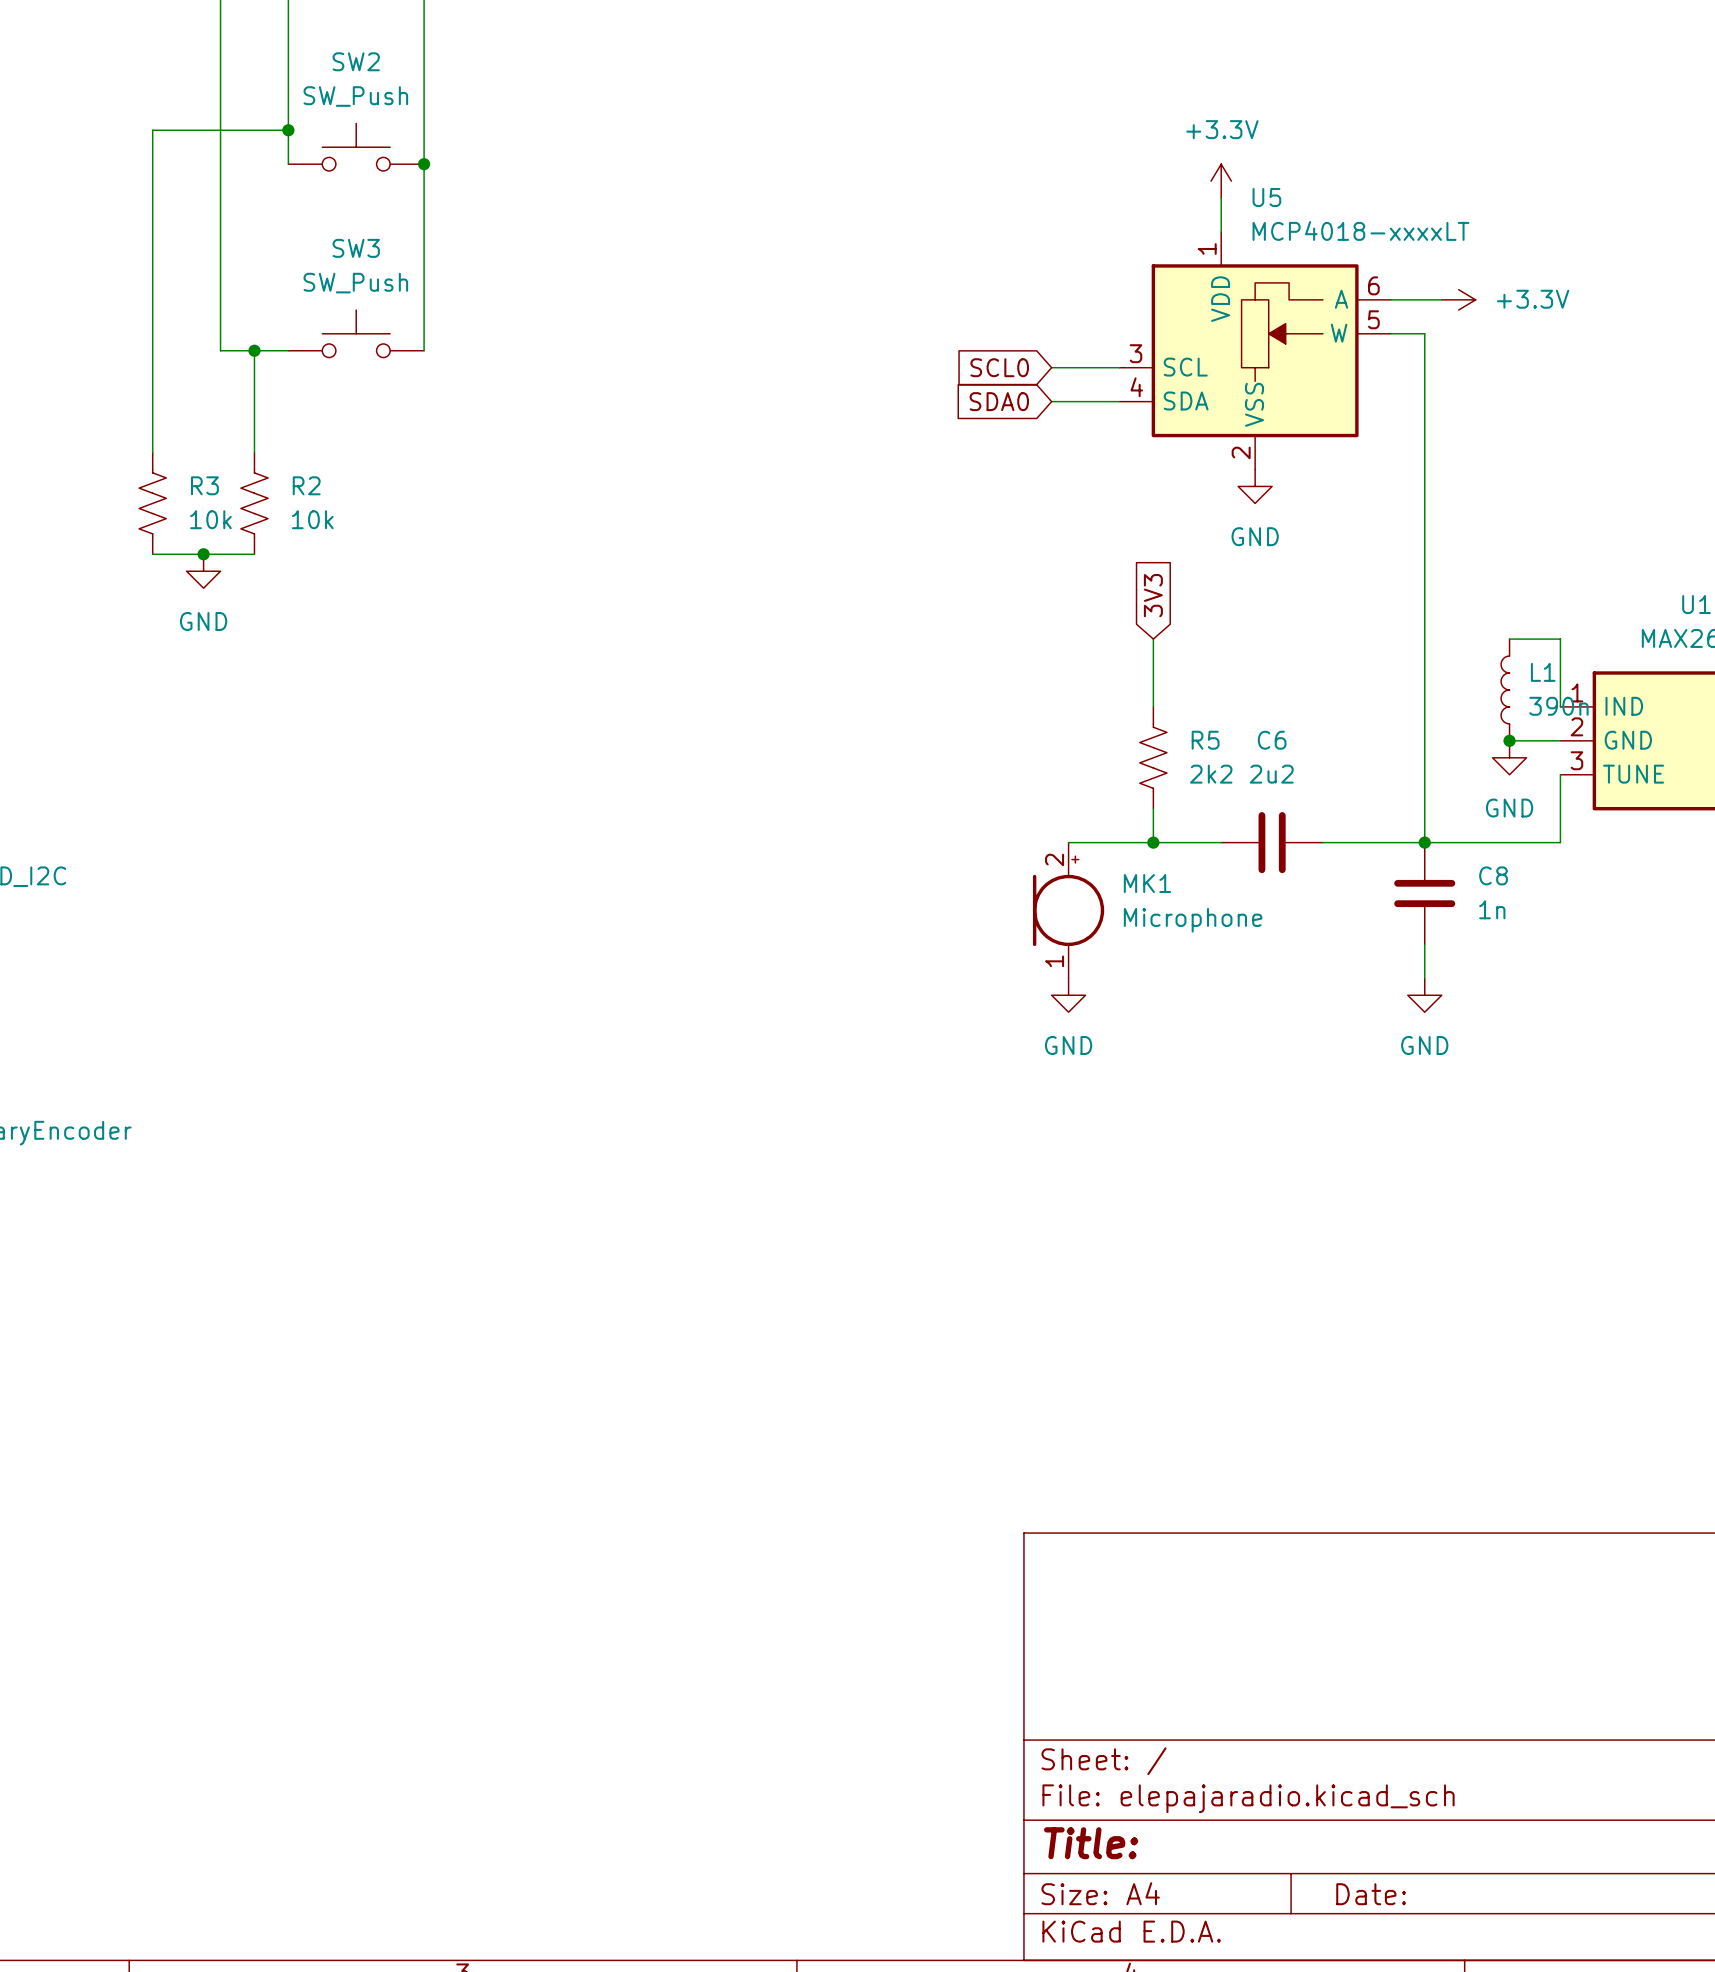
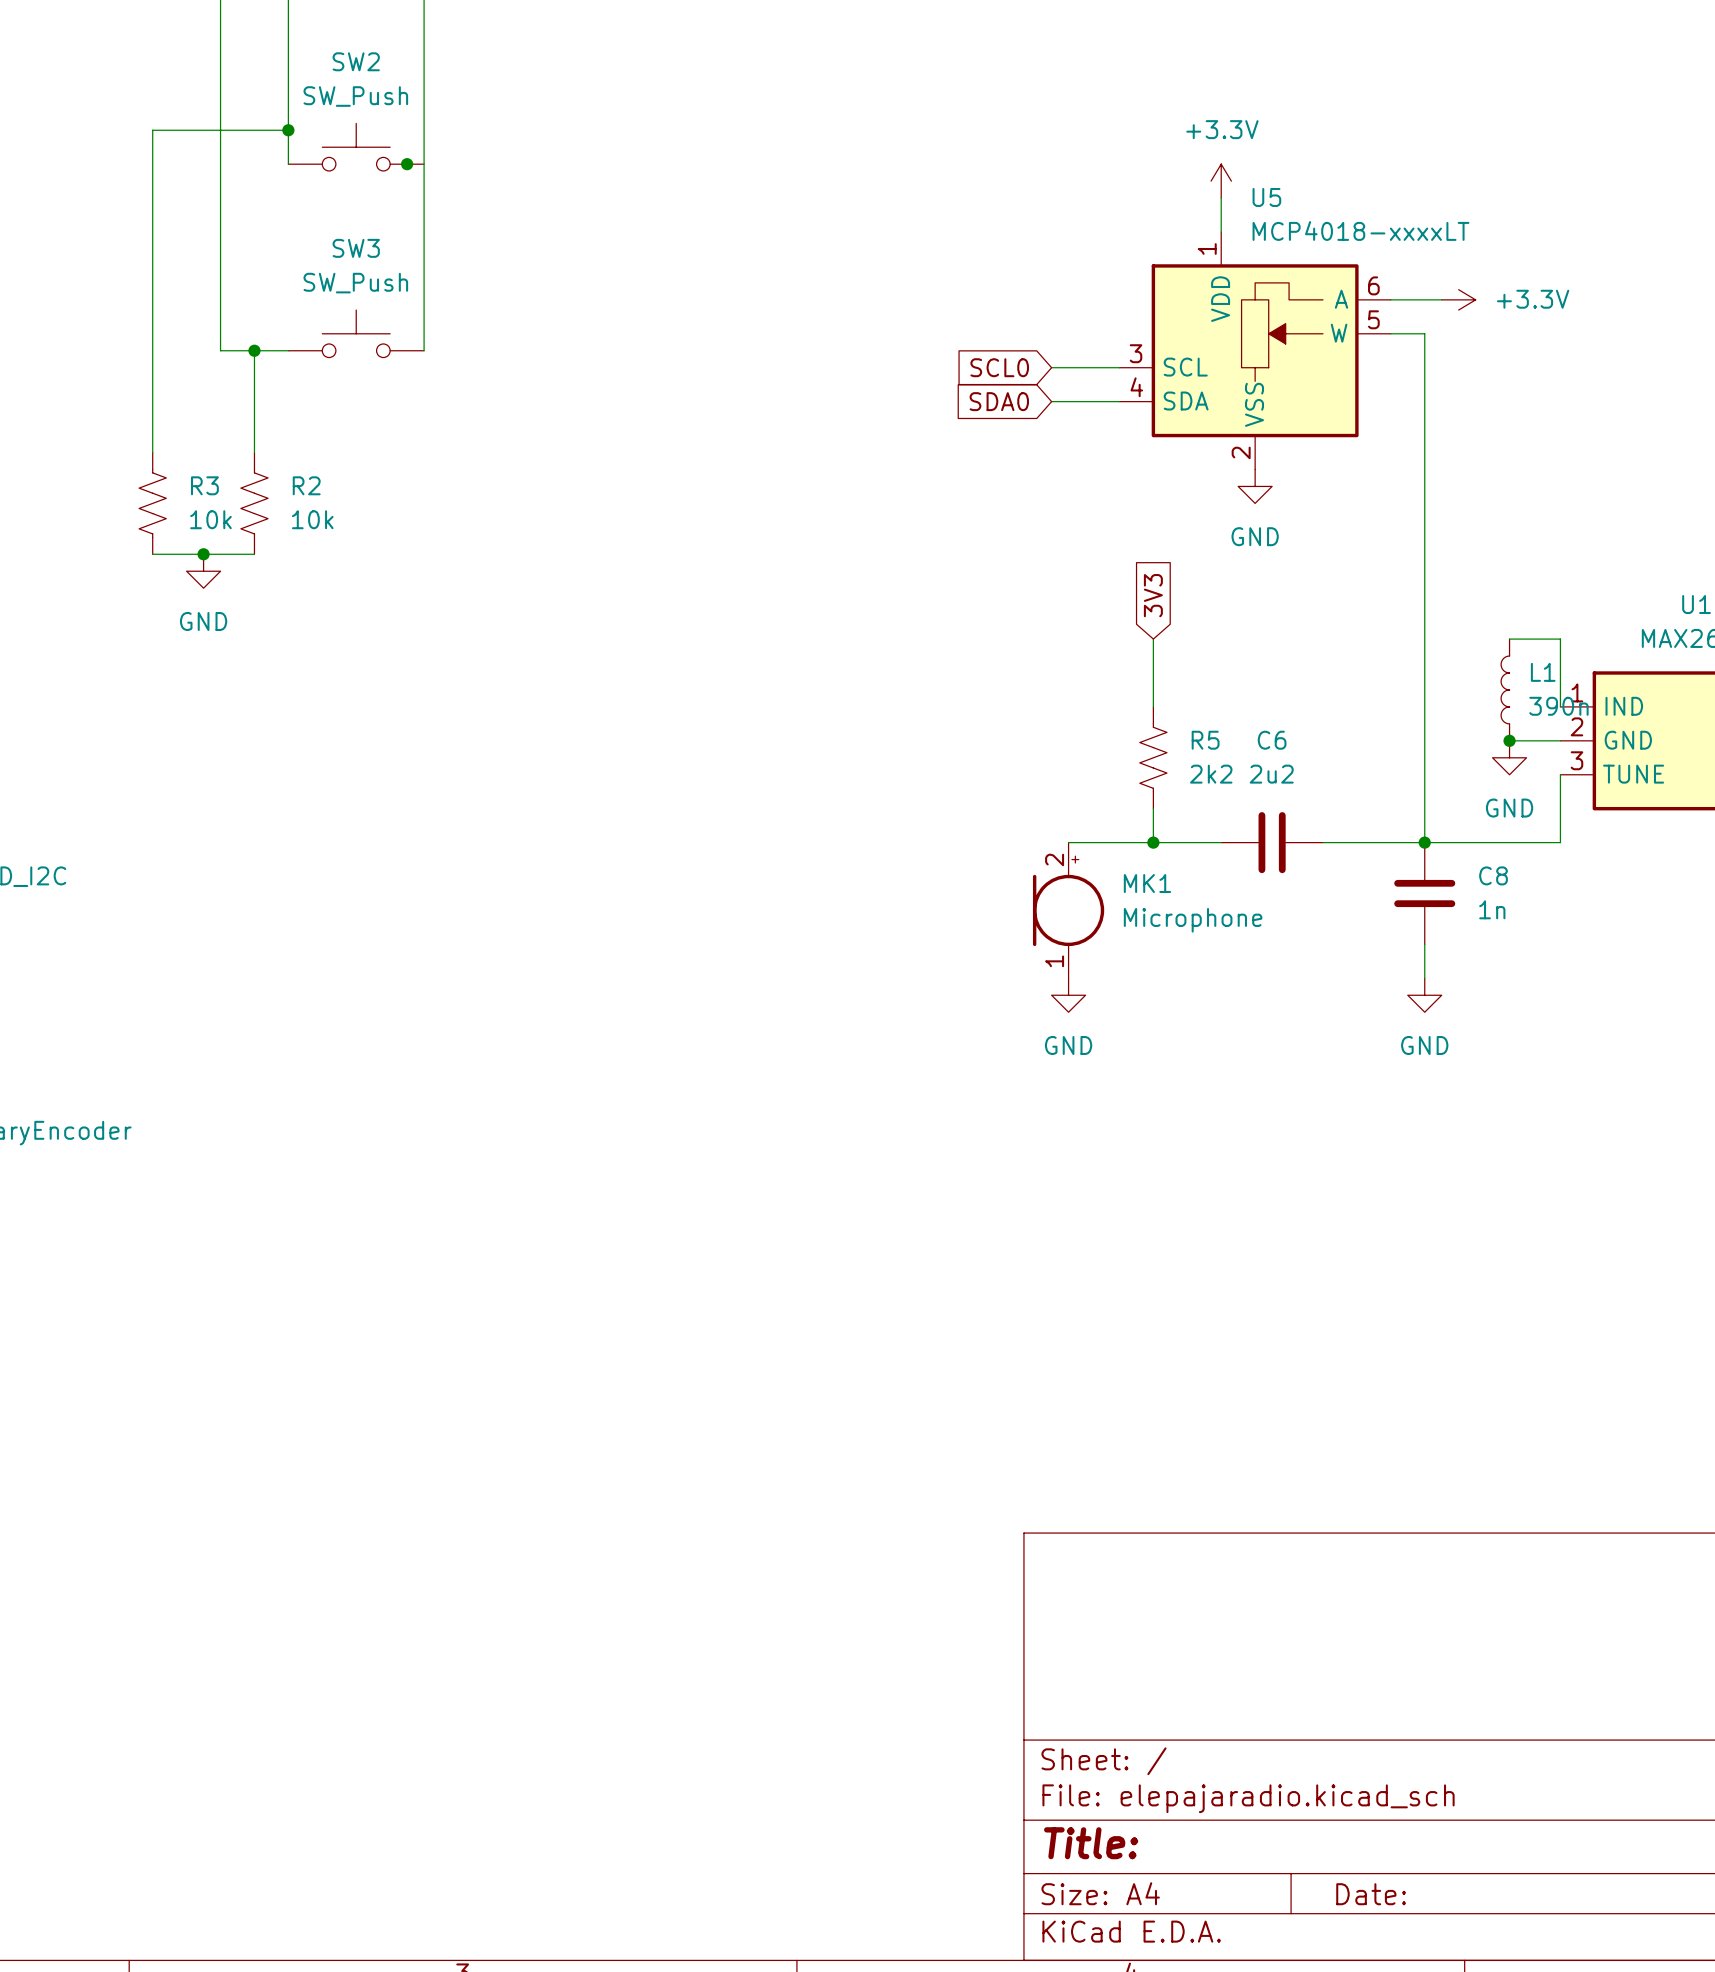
junction position: (424, 164) -> (407, 164)

